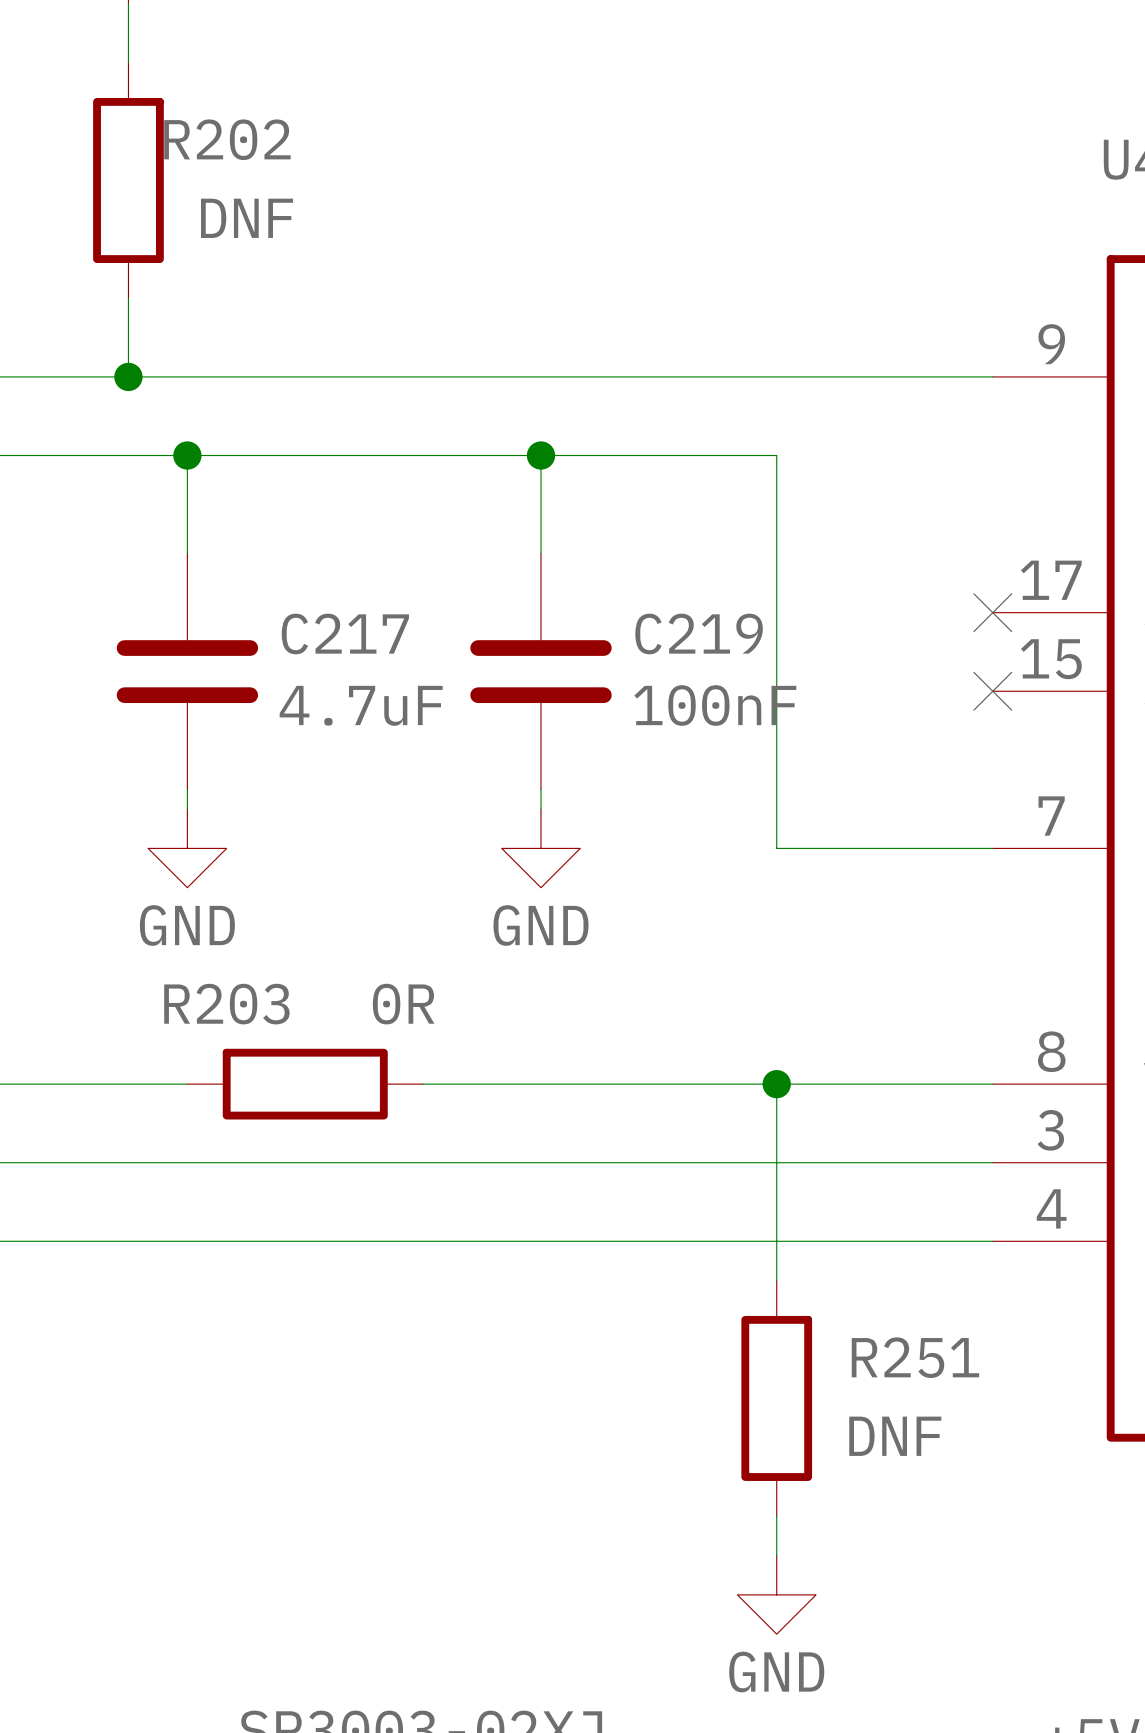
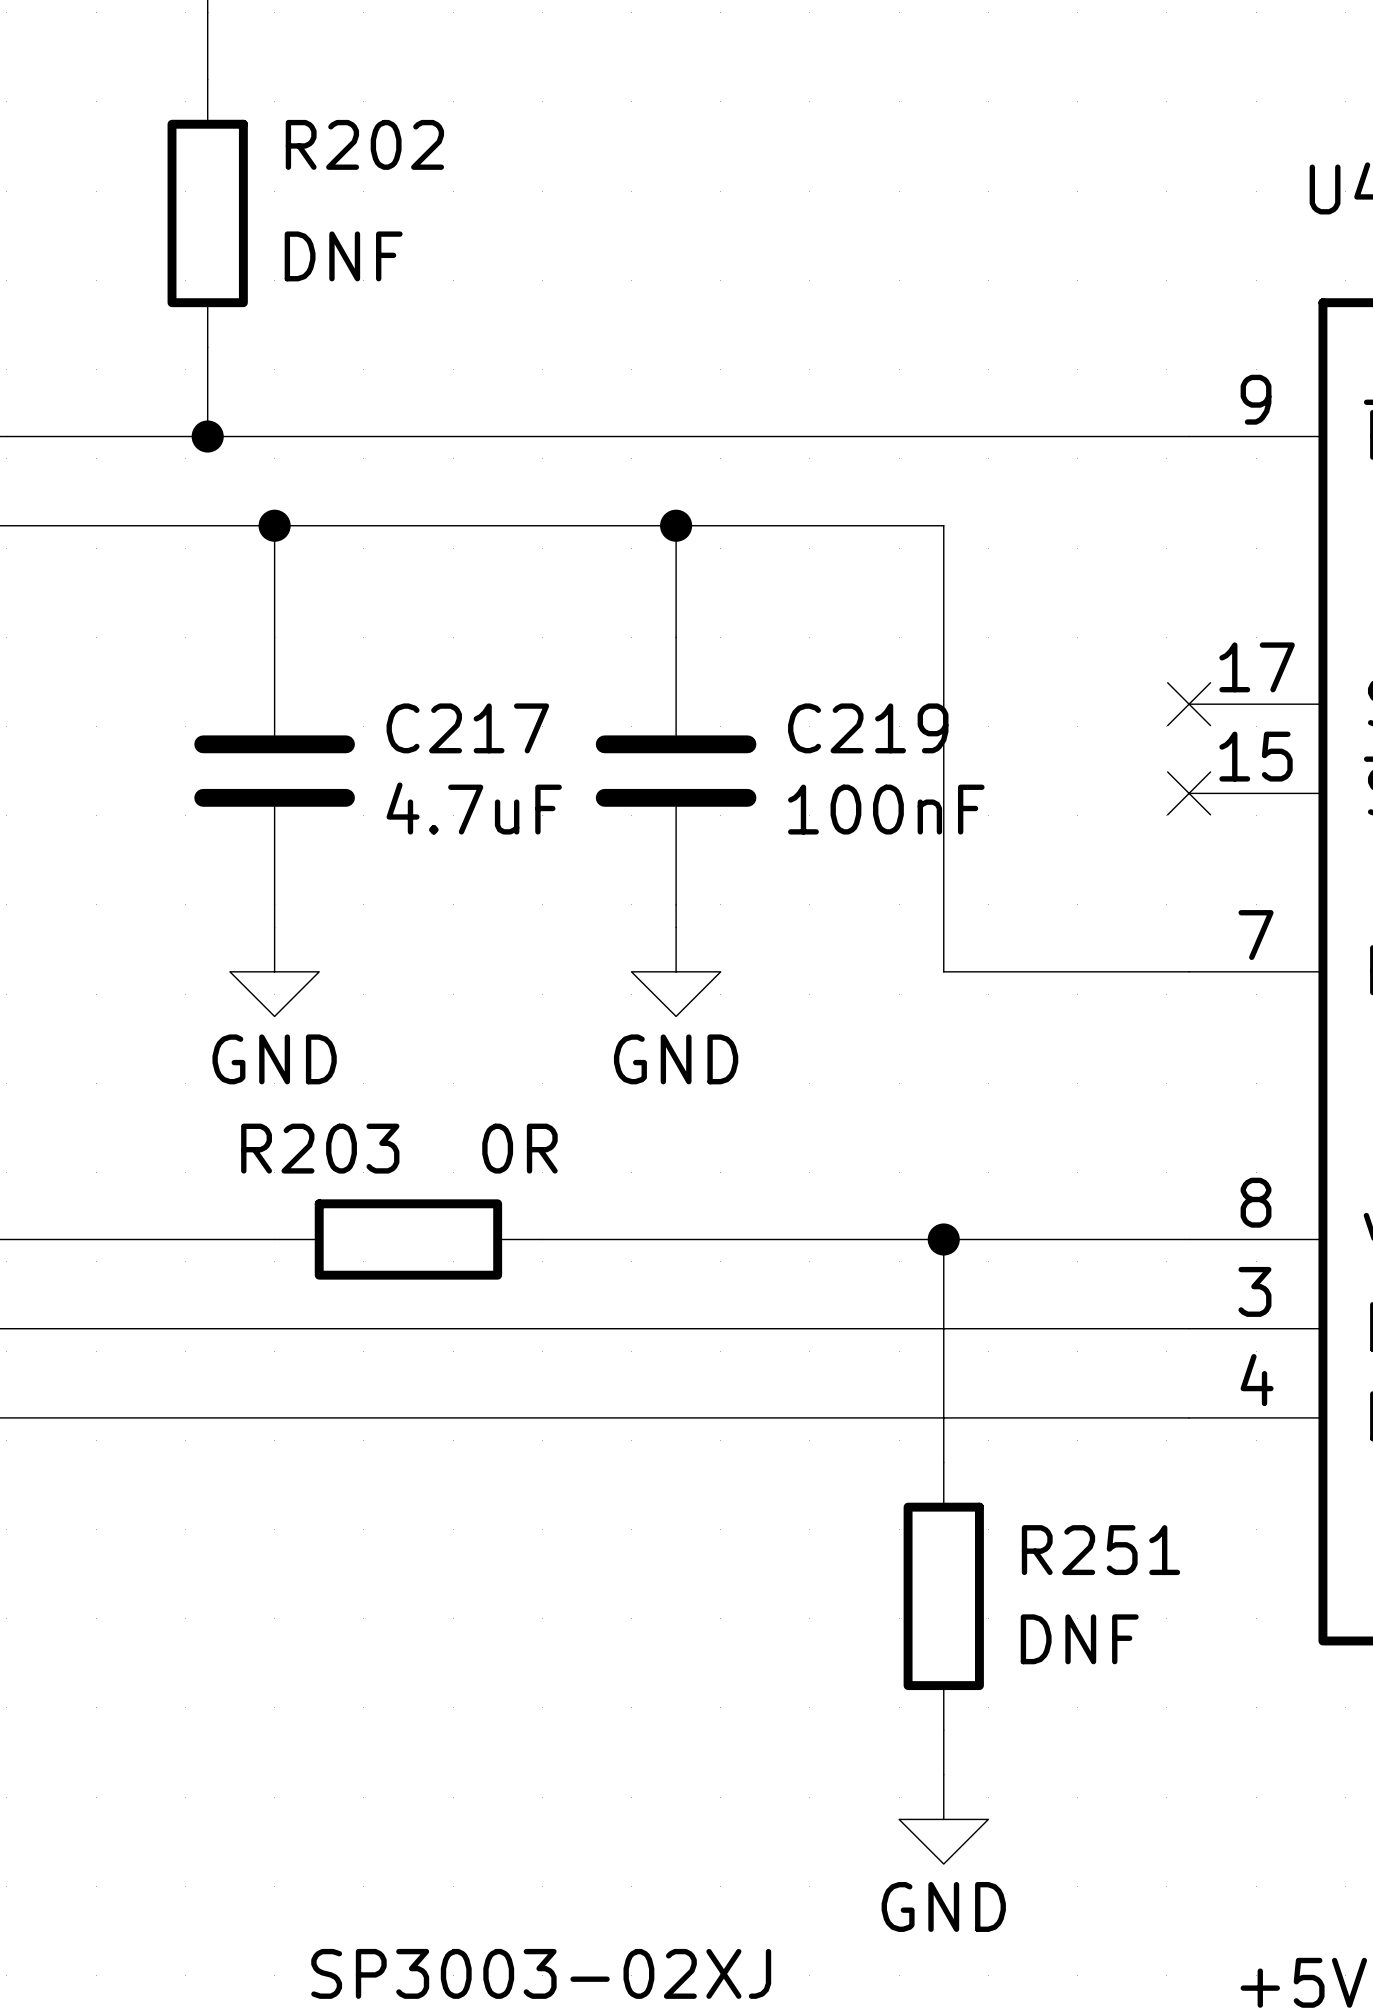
R202 name position: R202 (227, 139) -> R202 (364, 144)

